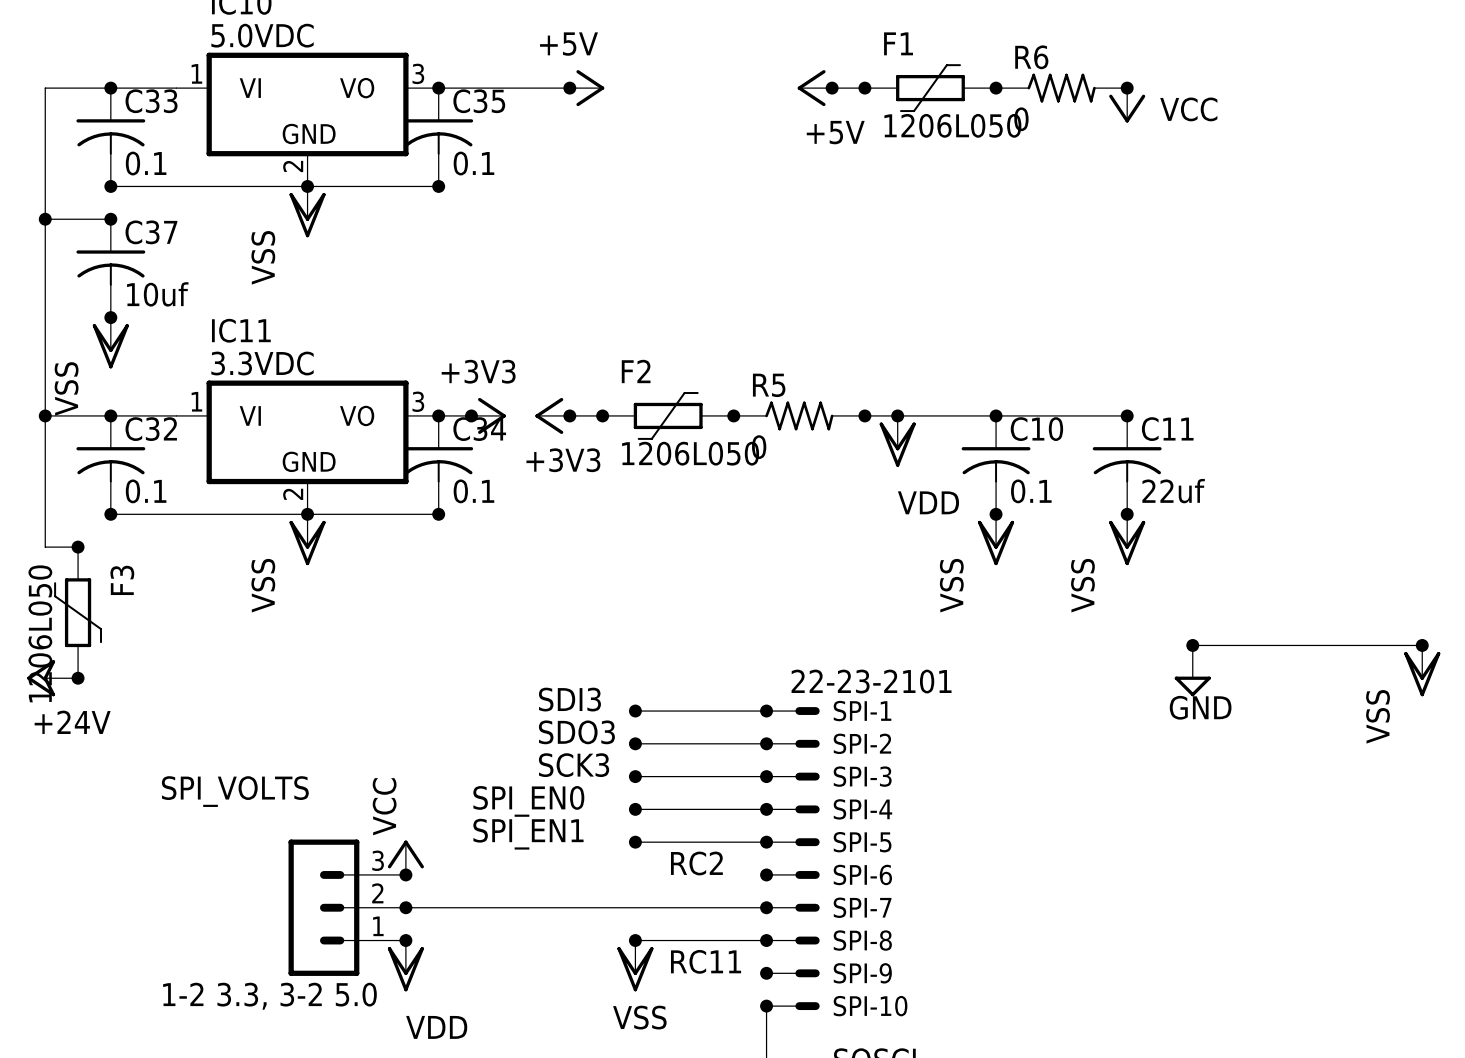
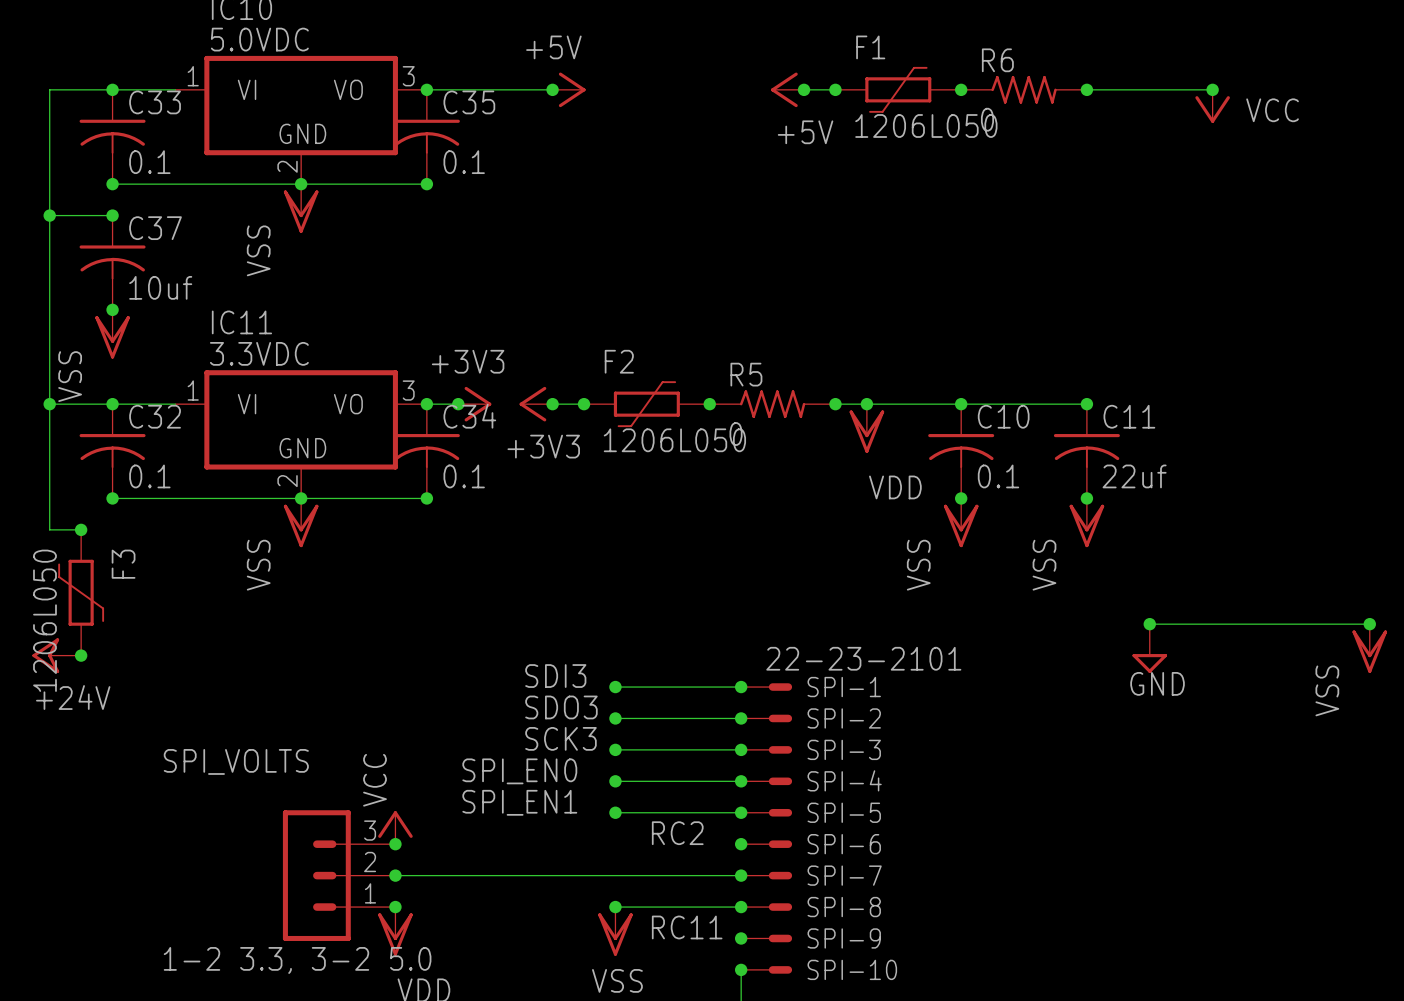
wire: none -> (1086, 89) (1212, 89)
junction: none -> (1212, 89)
power symbol position: VCC (1127, 105) -> VCC (1212, 106)

